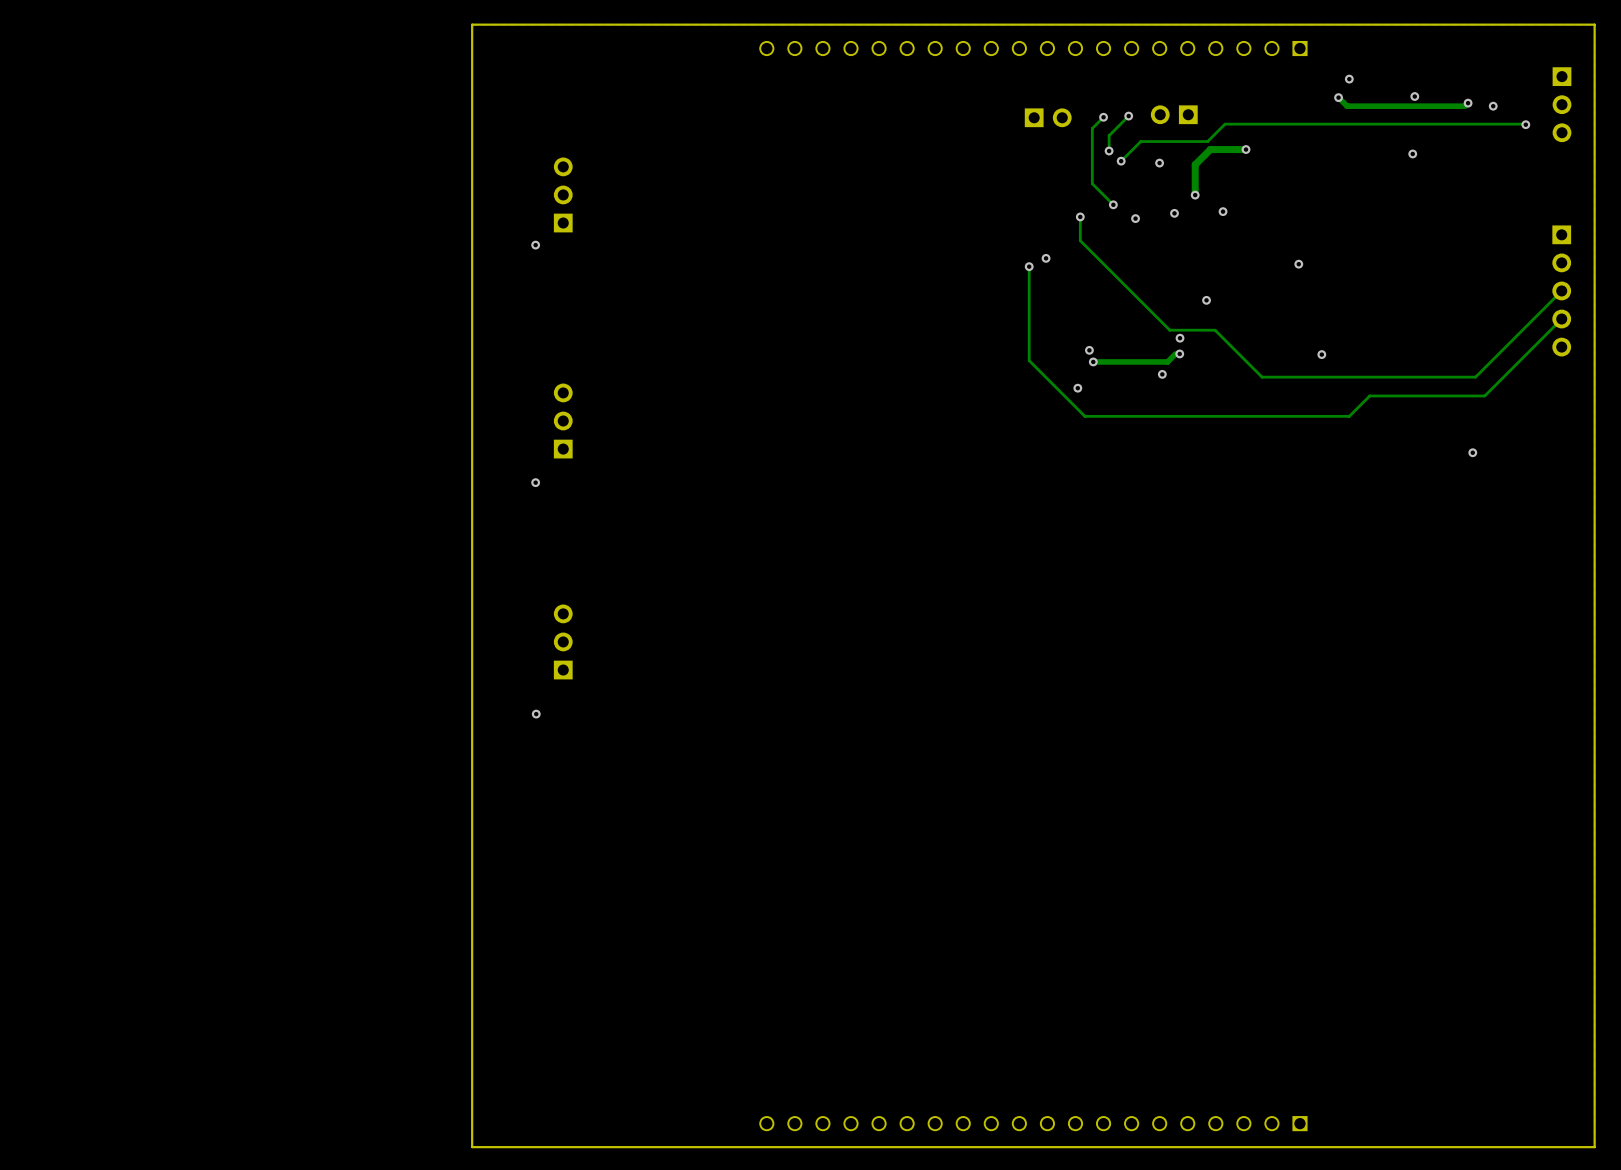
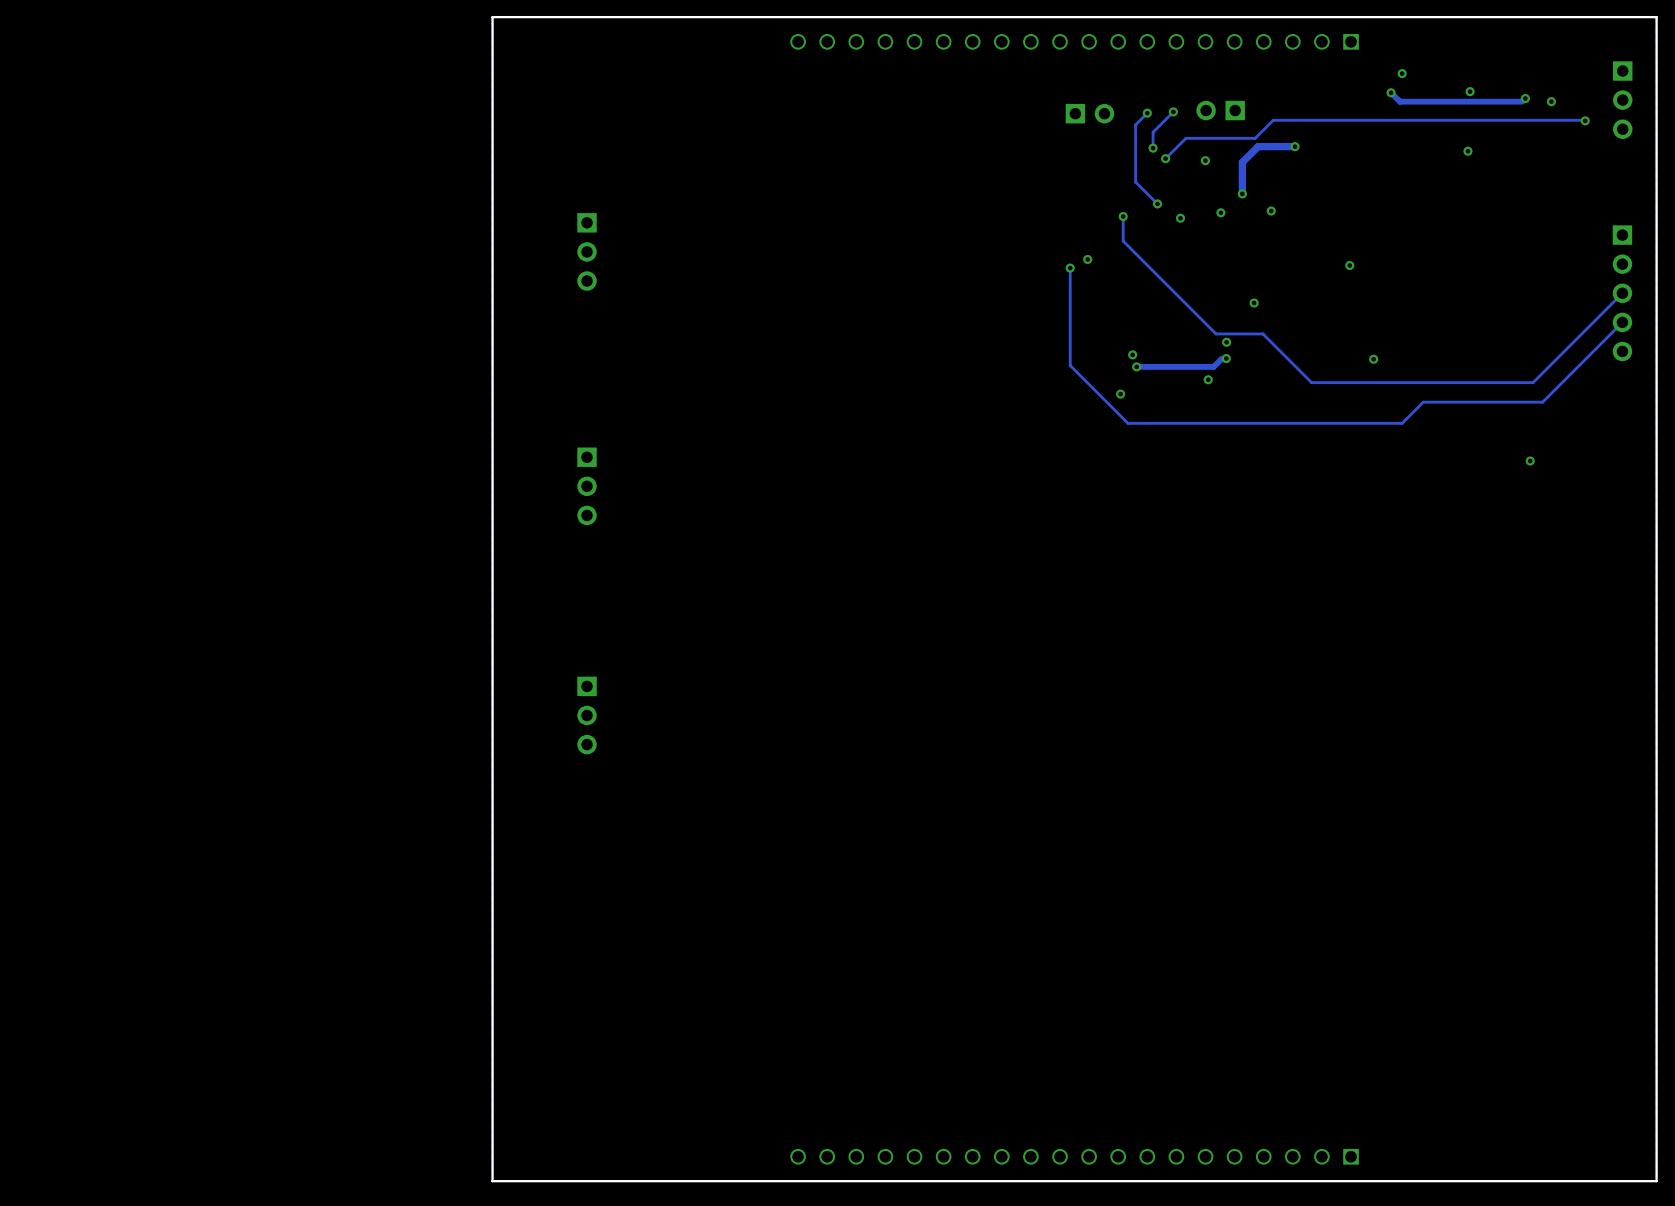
part rotation: 0° (563, 194) -> 180° (587, 251)
part position: (563, 194) -> (587, 251)
via: (535, 245) -> none
part rotation: 0° (563, 420) -> 180° (587, 486)
part position: (563, 420) -> (587, 486)
via: (535, 482) -> none
part rotation: 0° (563, 641) -> 180° (587, 715)
part position: (563, 641) -> (587, 715)
via: (536, 714) -> none

